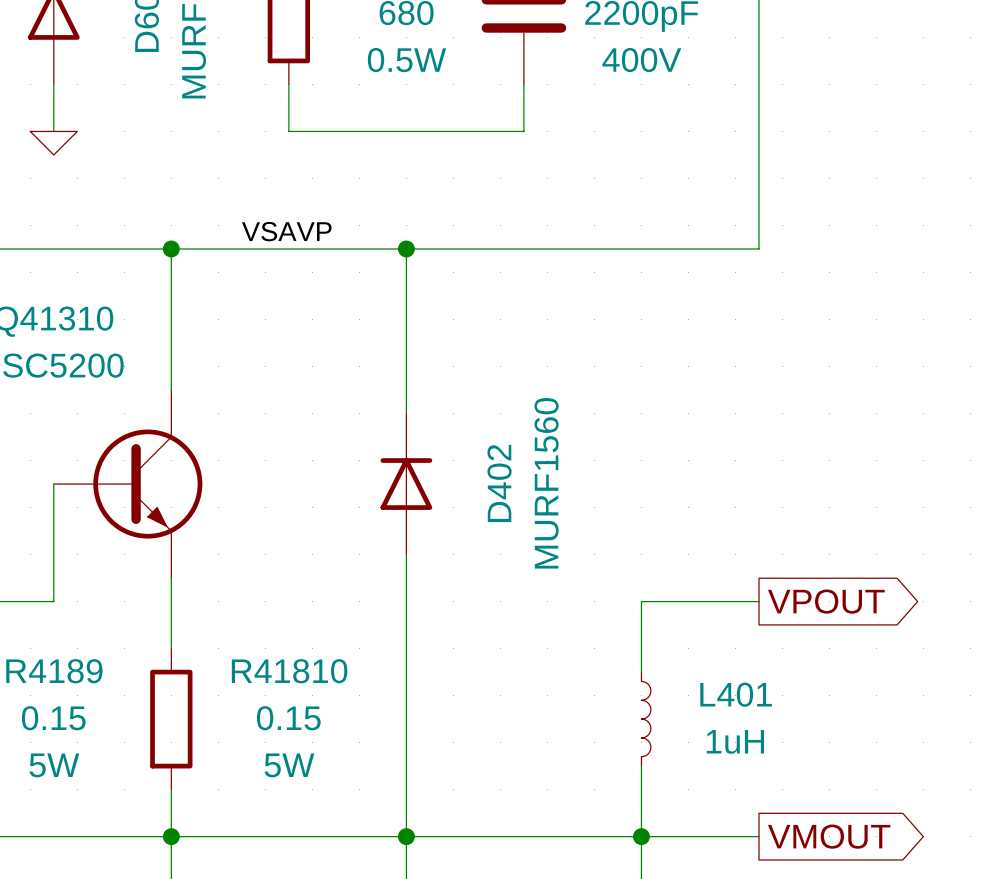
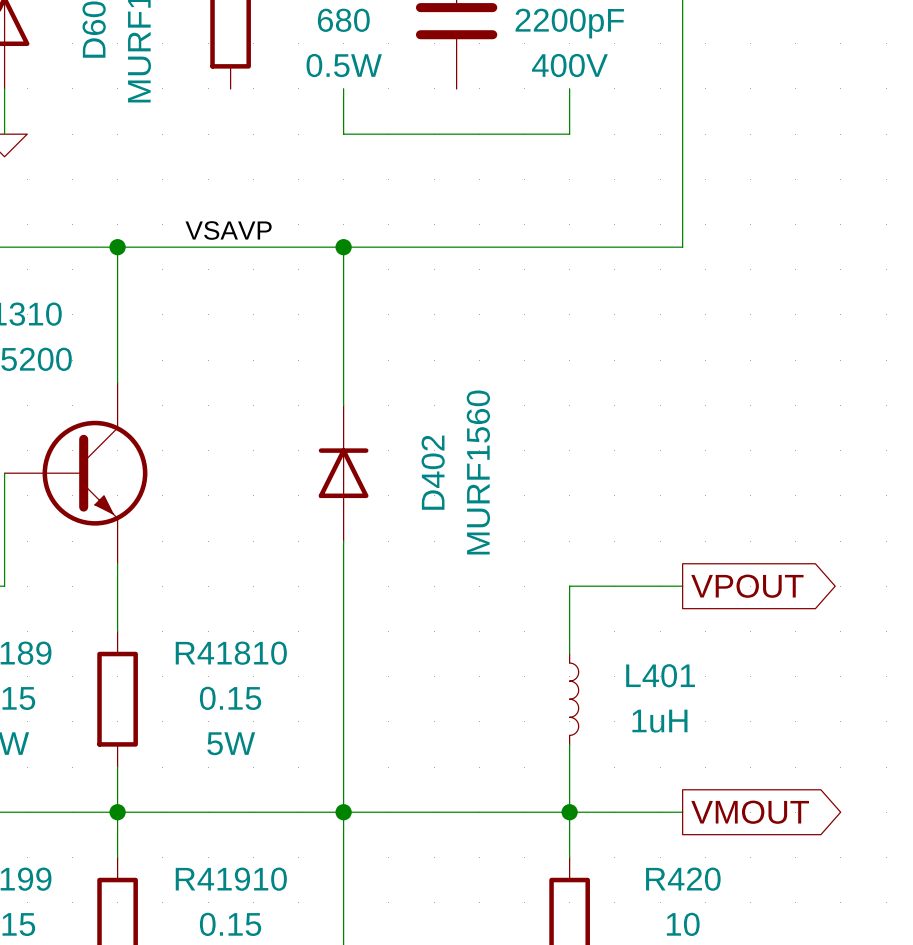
wire: (288, 84) (288, 131) (406, 131) -> (343, 88) (343, 134)
wire: (523, 84) (523, 131) -> (569, 88) (569, 134) (456, 134)

